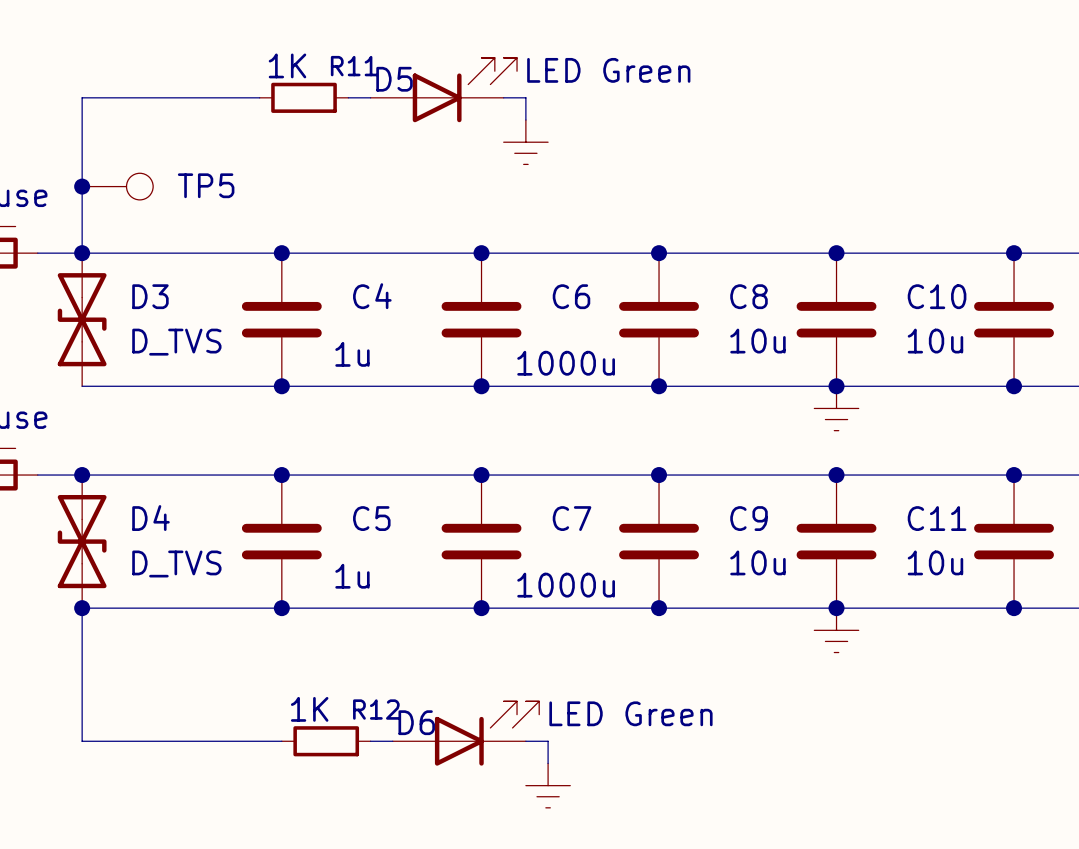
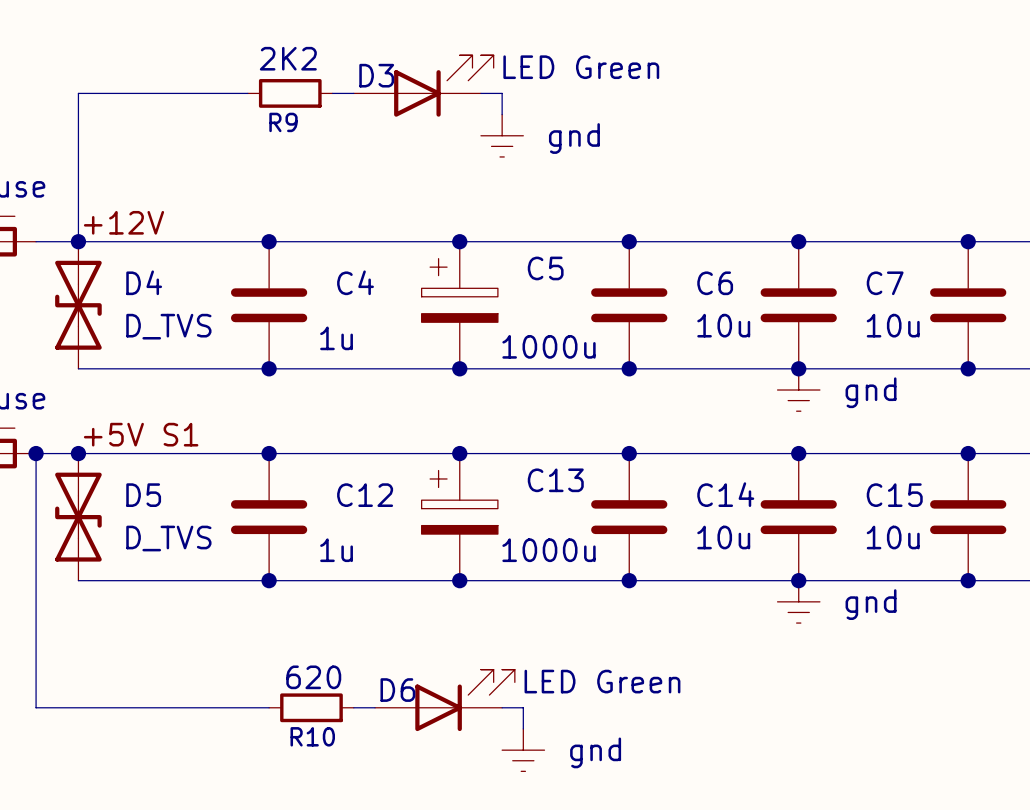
R11 value: 1K (287, 65) -> 2K2 (288, 58)
R11 name: R11 (354, 66) -> R9 (283, 122)
D5 name: D5 (394, 79) -> D3 (376, 75)
power symbol text: none -> gnd (574, 138)
junction: (82, 186) -> none
TP5: (117, 186) -> none
label: none -> +12V (123, 222)
D3 name: D3 (150, 296) -> D4 (144, 282)
C8 name: C8 (748, 296) -> C6 (715, 283)
C10 name: C10 (937, 296) -> C7 (885, 283)
C6: 1000u (481, 319) -> none
C5: none -> 1000u (459, 305)
power symbol text: none -> gnd (871, 392)
label: none -> +5V S1 (141, 434)
junction: none -> (36, 453)
D4 name: D4 (150, 518) -> D5 (143, 495)
C5 name: C5 (371, 518) -> C12 (365, 495)
C9 name: C9 (748, 518) -> C14 (725, 494)
C11 name: C11 (937, 518) -> C15 (894, 495)
C7: 1000u (481, 541) -> none
C13: none -> 1000u (459, 517)
wire: (82, 608) (82, 741) -> (36, 453) (36, 707) (78, 707)
junction: (82, 608) -> none
power symbol text: none -> gnd (871, 604)
R12 value: 1K (309, 709) -> 620 (313, 677)
R12 name: R12 (376, 709) -> R10 (312, 736)
power symbol text: none -> gnd (595, 752)

